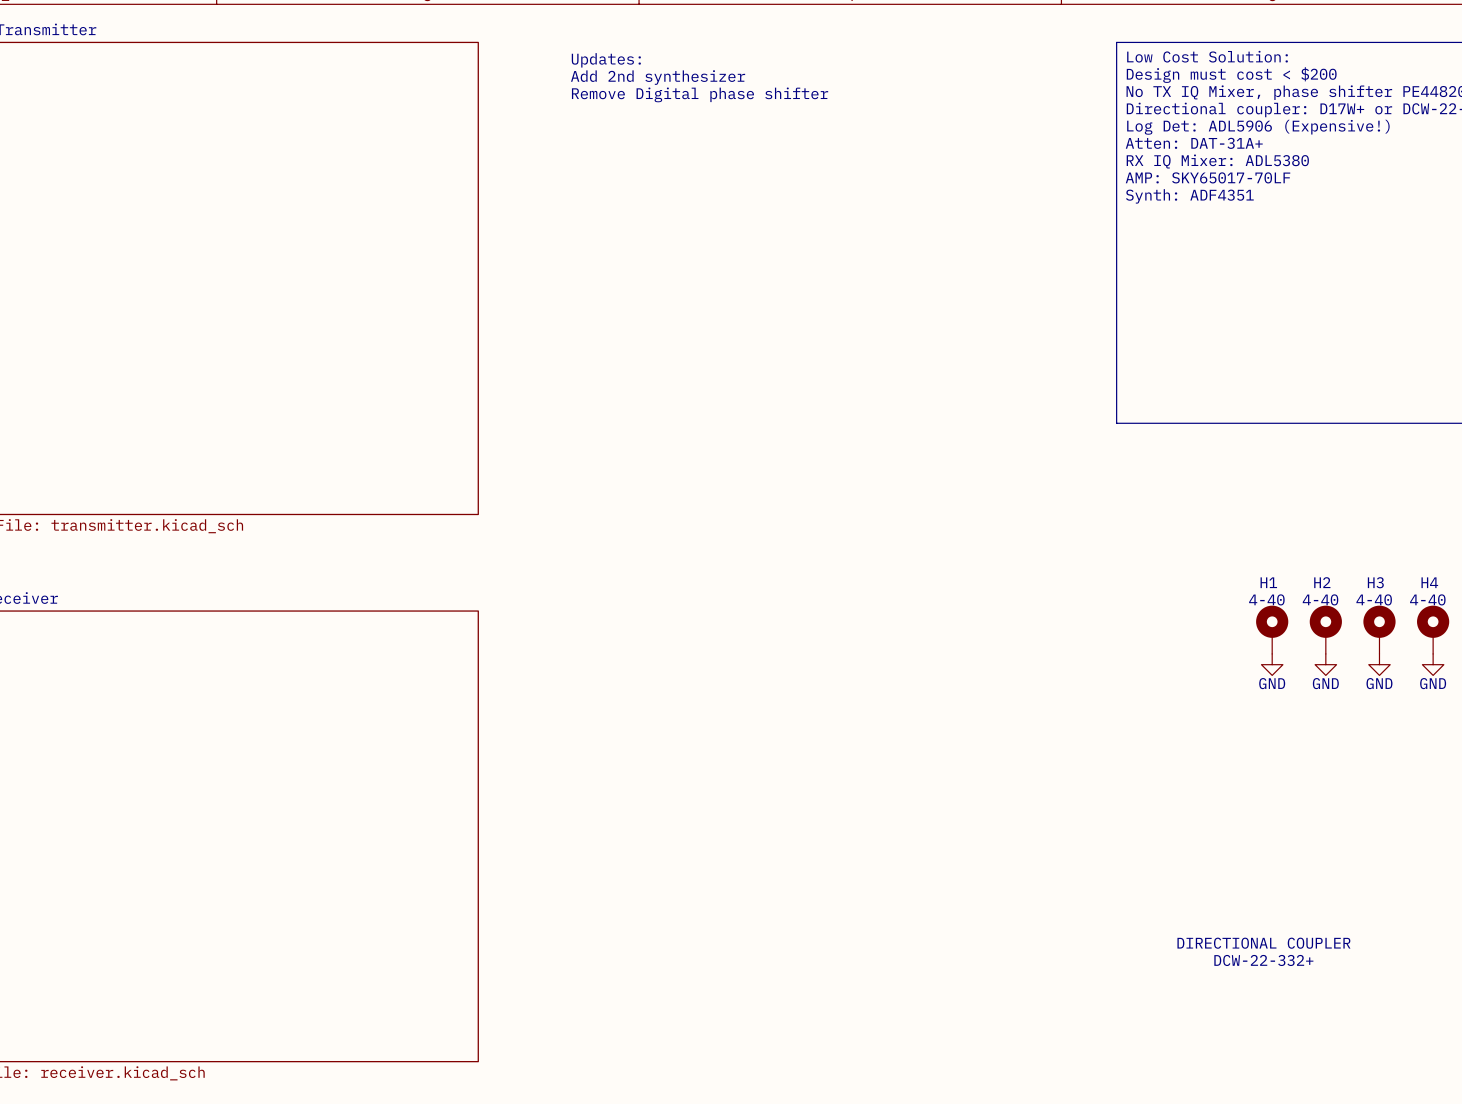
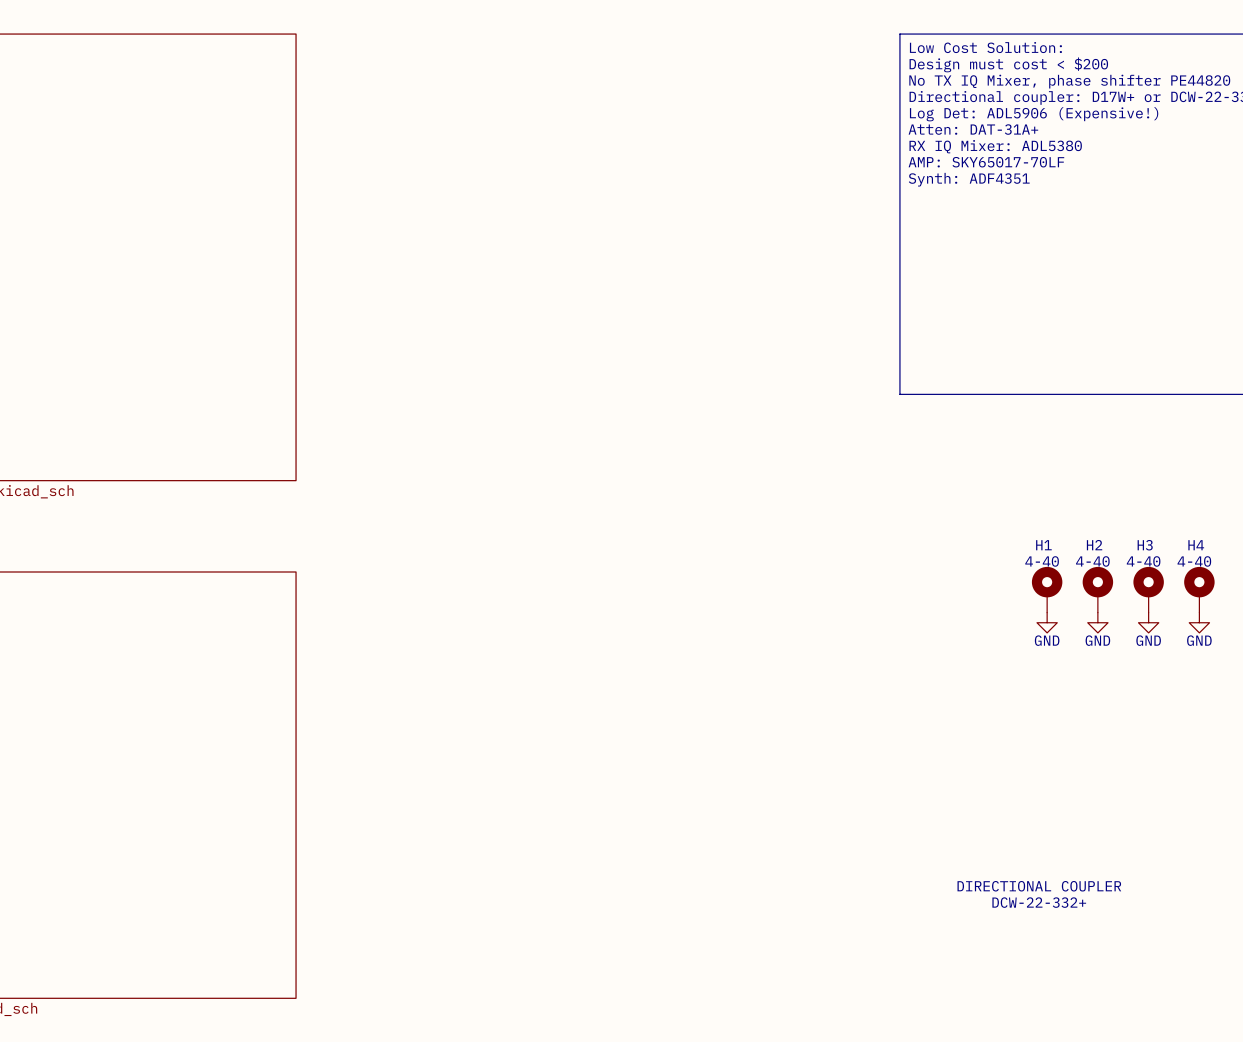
text: Updates: (606, 60) -> none
text: Add 2nd synthesizer (658, 77) -> none
text: Remove Digital phase shifter (700, 94) -> none

